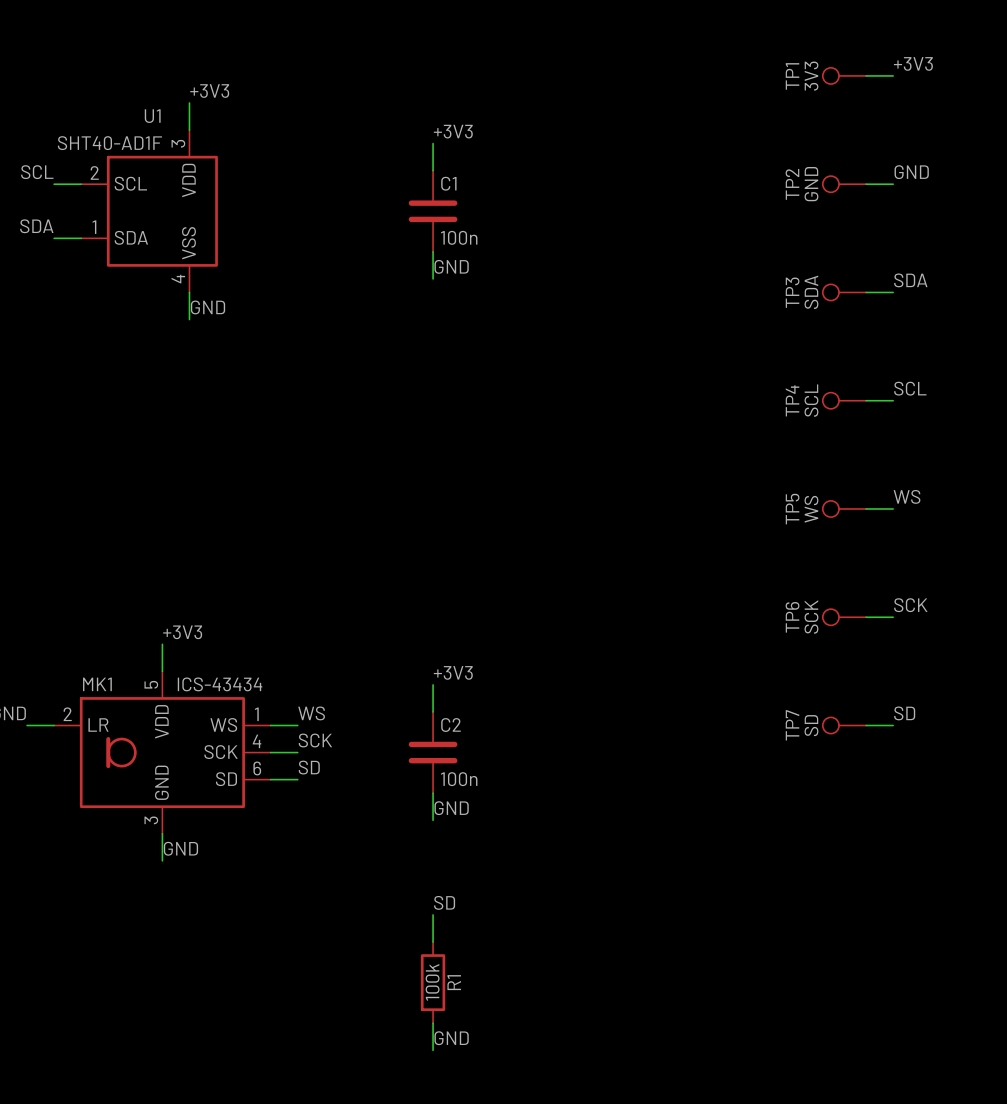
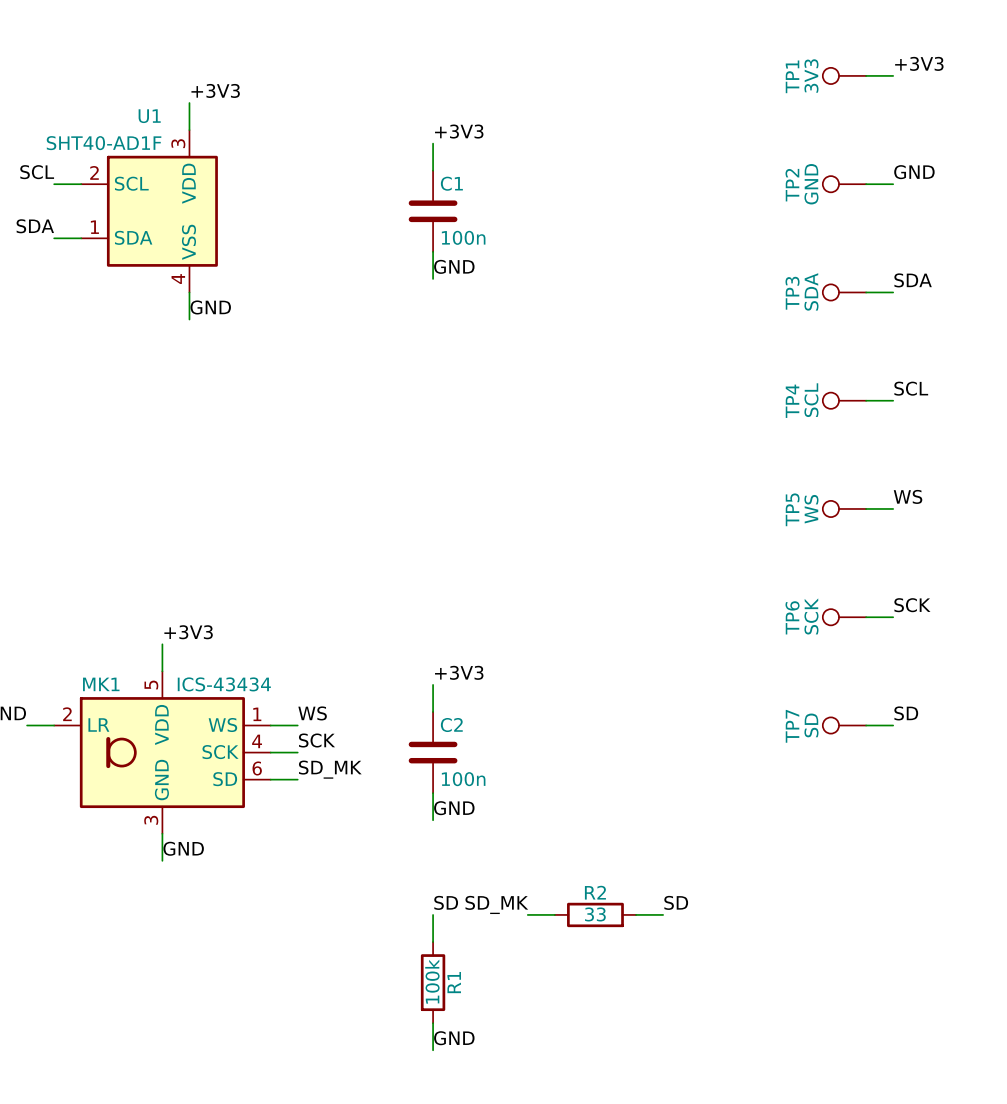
label: SD (309, 767) -> SD_MK (330, 769)
label: none -> SD_MK (496, 904)
label: none -> SD (676, 902)
wire: none -> (527, 914) (554, 914)
R2: none -> 33 (595, 914)
wire: none -> (636, 914) (663, 914)

